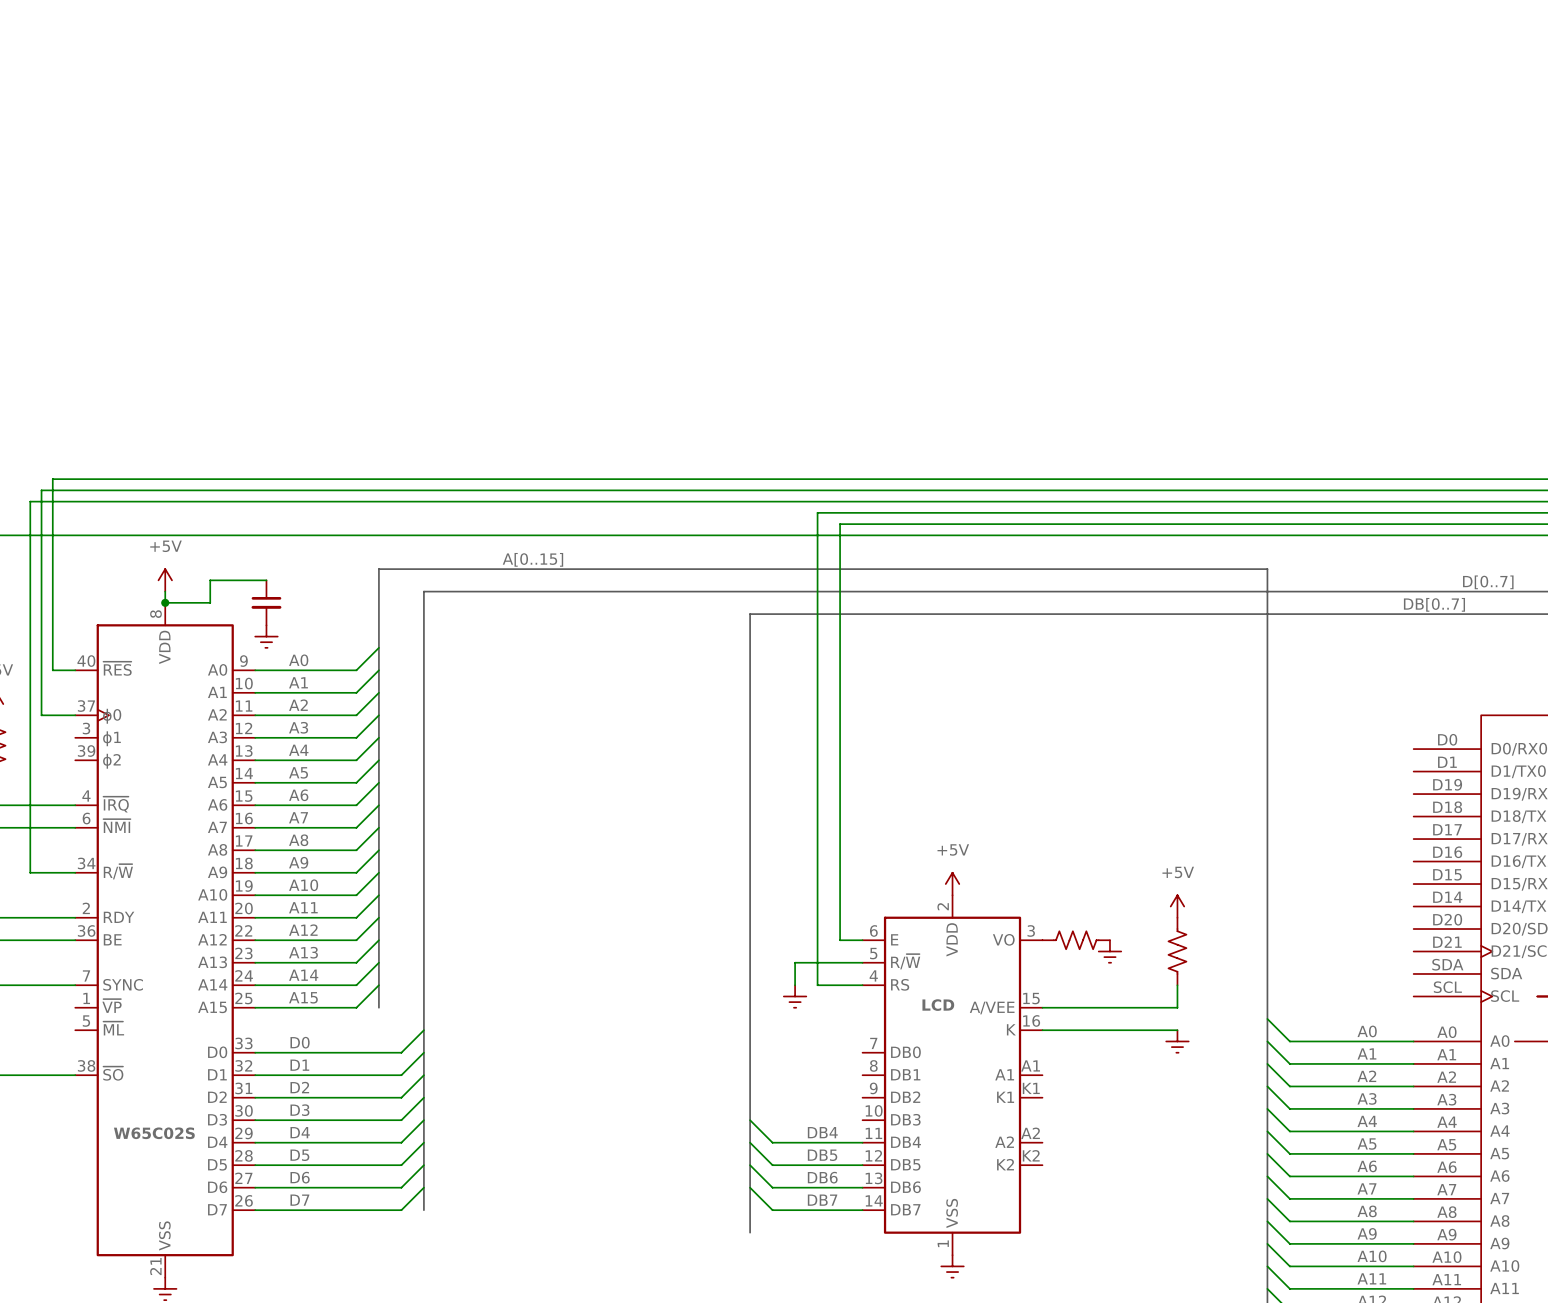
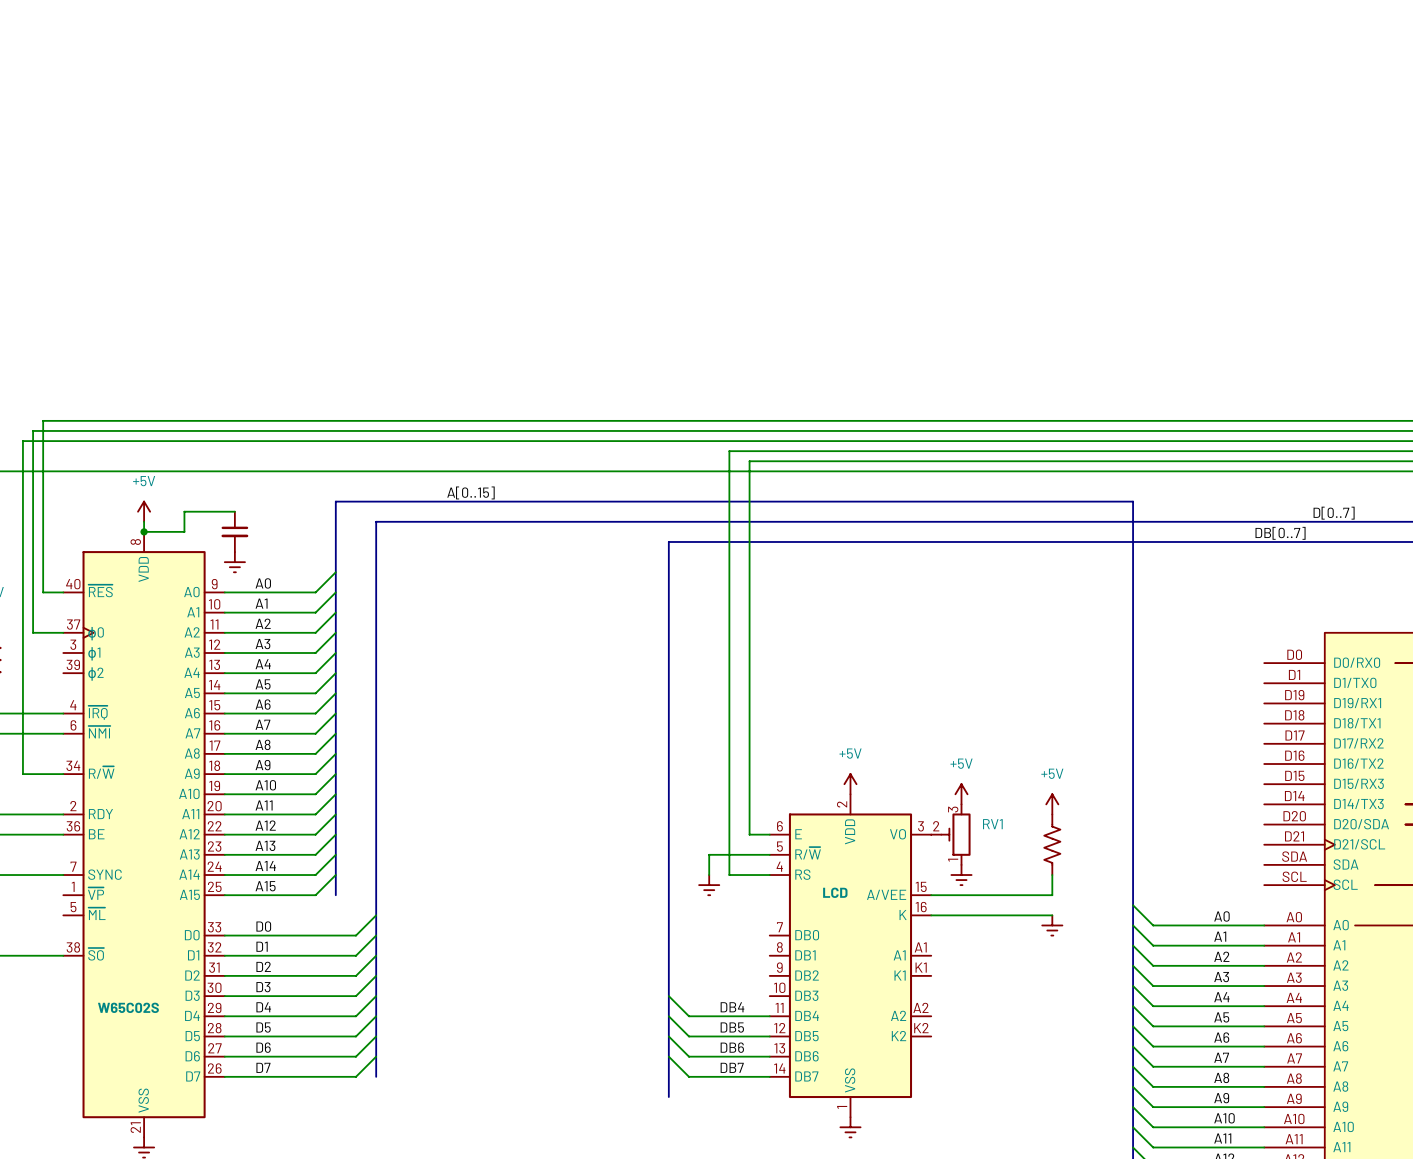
power symbol: none -> +5V (961, 794)
RV1: none -> (950, 834)
part: (1076, 940) -> none
power symbol position: (1109, 951) -> (961, 875)

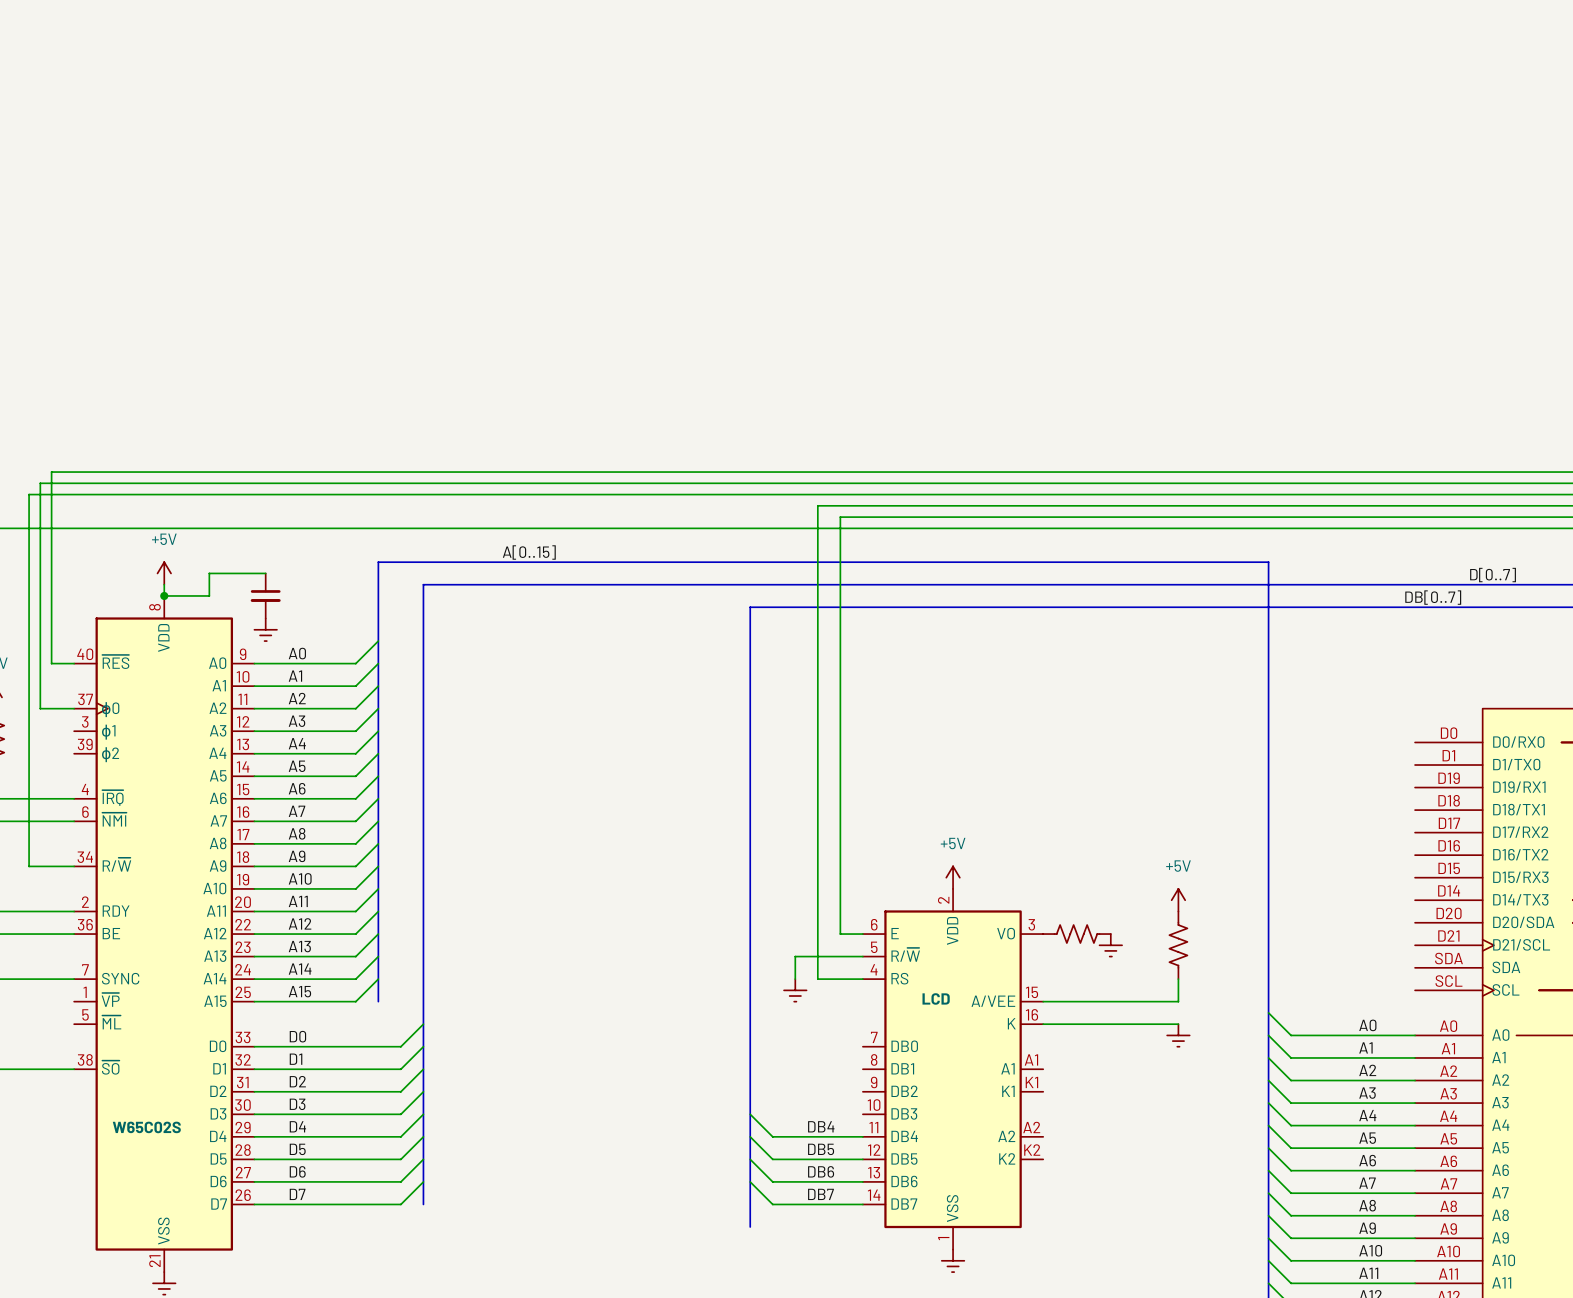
power symbol: +5V (961, 794) -> none
RV1: (950, 834) -> none
part: none -> (1077, 934)
power symbol position: (961, 875) -> (1110, 945)

